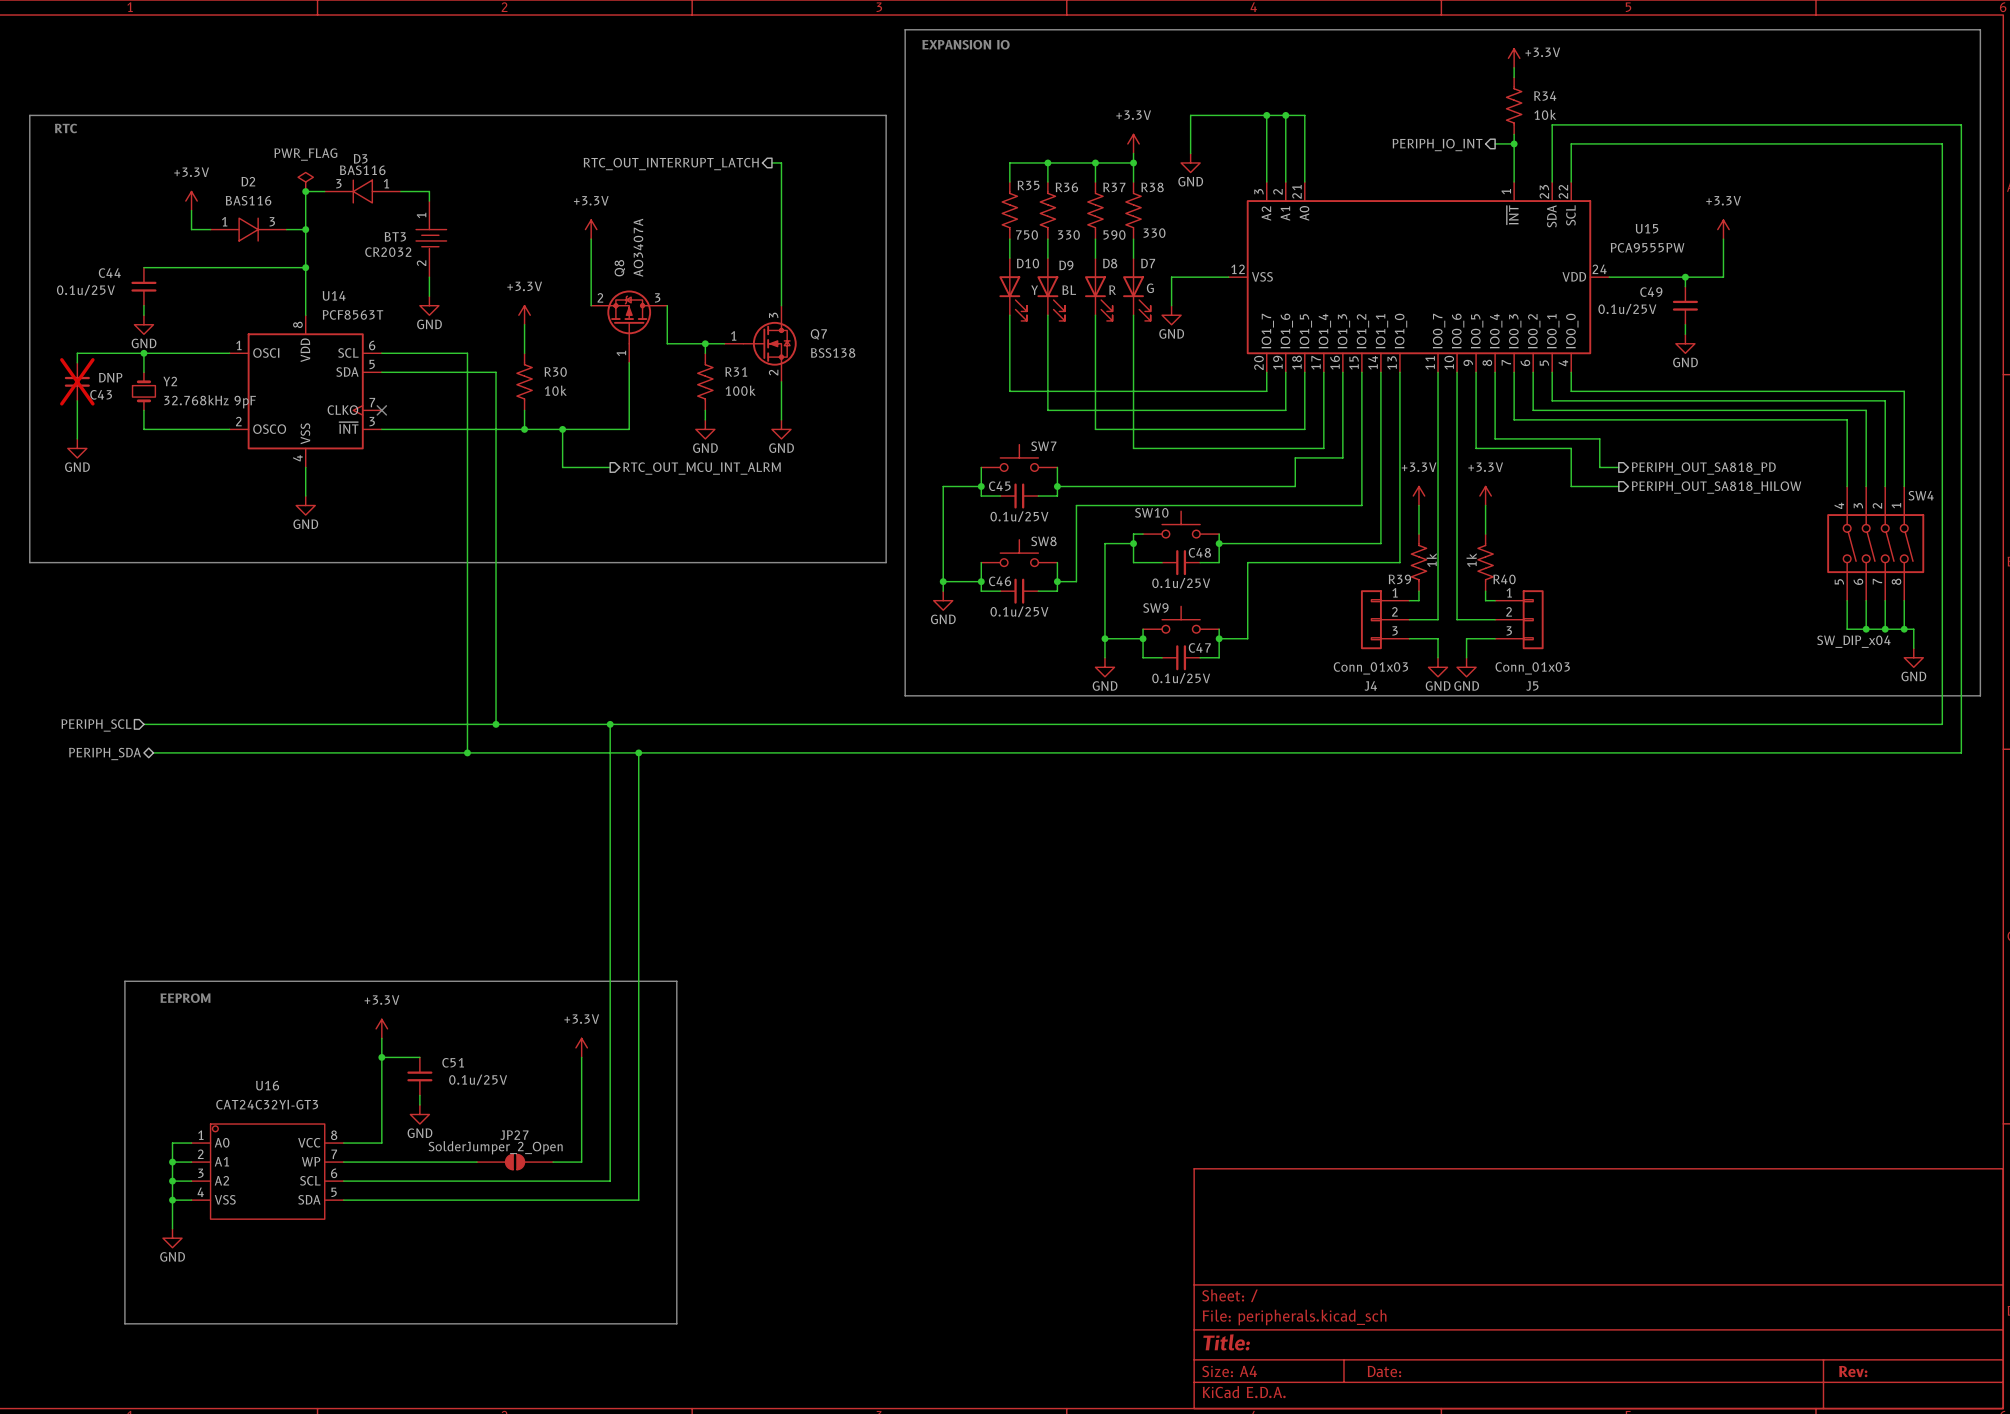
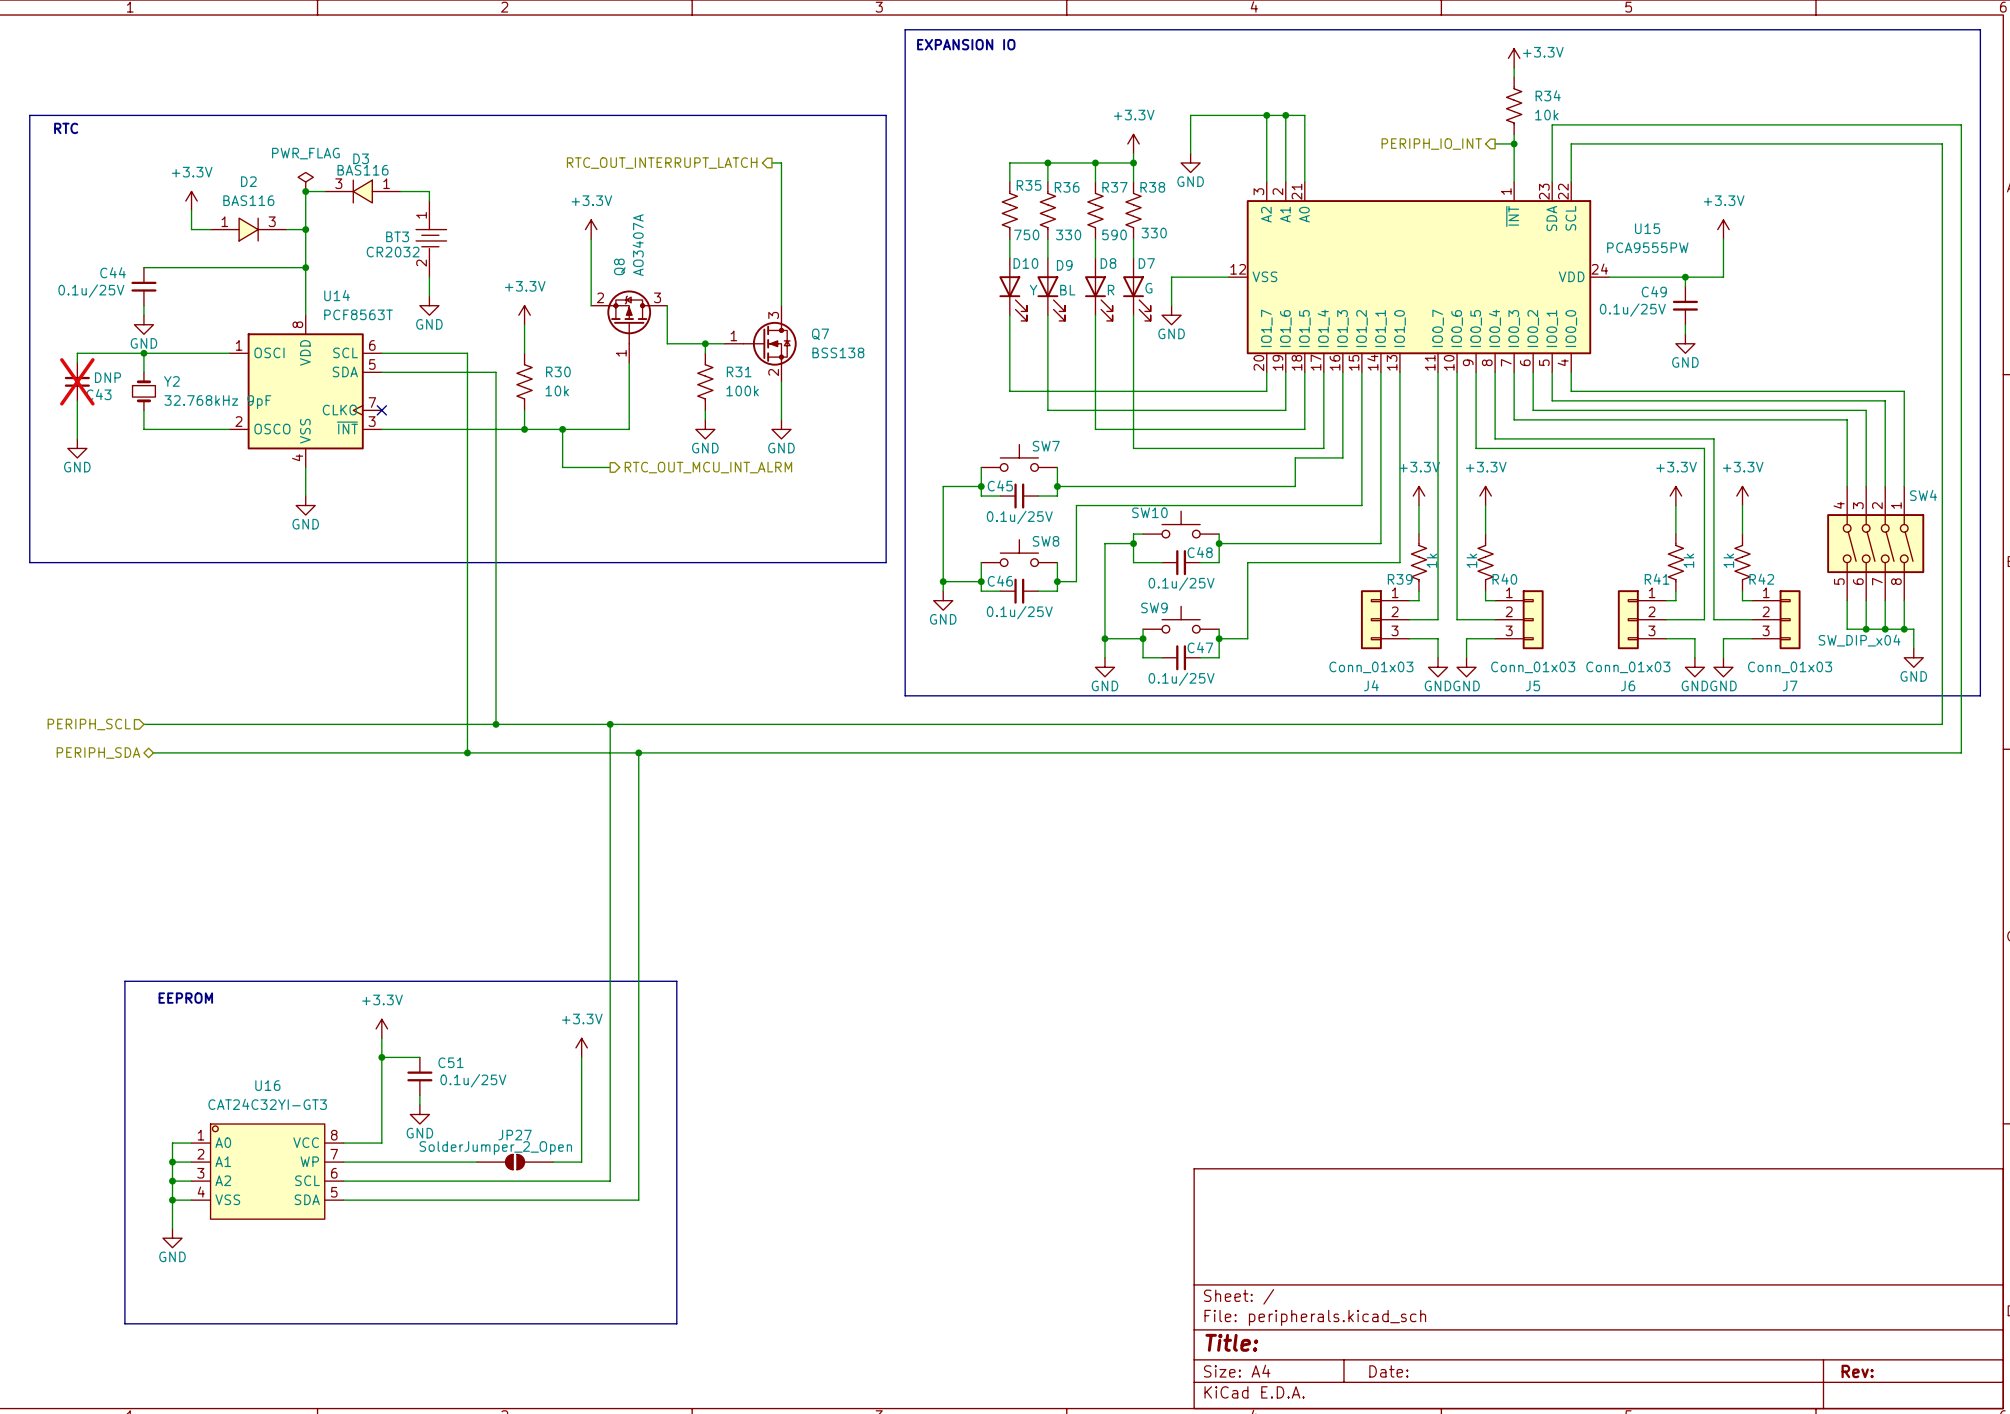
wire: (1599, 438) (1599, 467) (1618, 467) -> (1599, 438) (1713, 438) (1713, 619) (1752, 619)
wire: (1571, 448) (1571, 486) (1618, 486) -> (1571, 448) (1704, 448) (1704, 619) (1666, 619)
hierarchical label: PERIPH_OUT_SA818_PD (1703, 468) -> none
hierarchical label: PERIPH_OUT_SA818_HILOW (1716, 487) -> none
power symbol: none -> +3.3V (1675, 496)
power symbol: none -> +3.3V (1742, 496)
wire: none -> (1675, 505) (1675, 534)
wire: none -> (1742, 505) (1742, 534)
R41: none -> 1k (1675, 562)
R42: none -> 1k (1742, 562)
wire: none -> (1675, 591) (1675, 600) (1666, 600)
wire: none -> (1742, 591) (1742, 600) (1752, 600)
J6: none -> Conn_01x03 (1642, 619)
J7: none -> Conn_01x03 (1776, 619)
wire: none -> (1666, 638) (1694, 638) (1694, 657)
wire: none -> (1752, 638) (1723, 638) (1723, 657)
power symbol: none -> GND (1694, 667)
power symbol: none -> GND (1723, 667)

